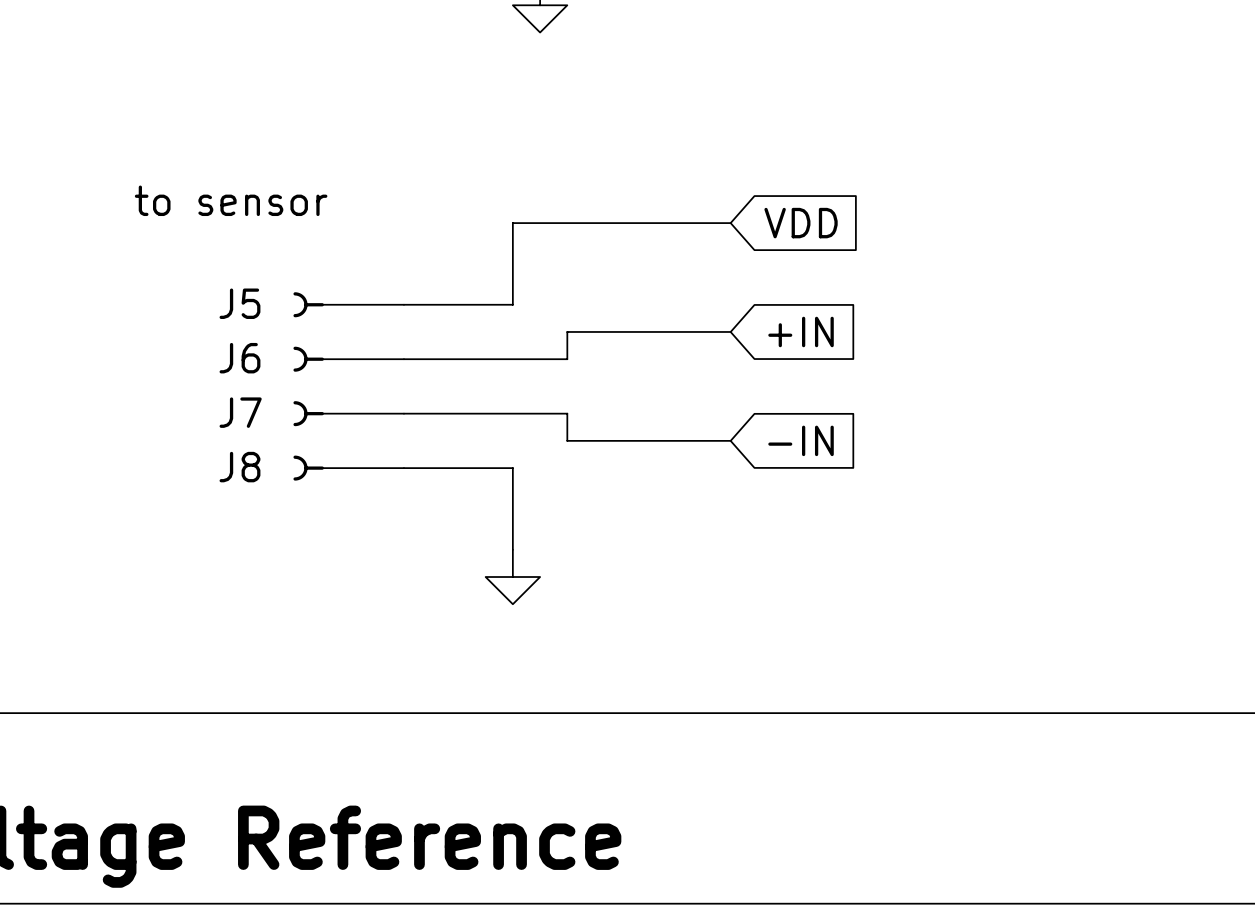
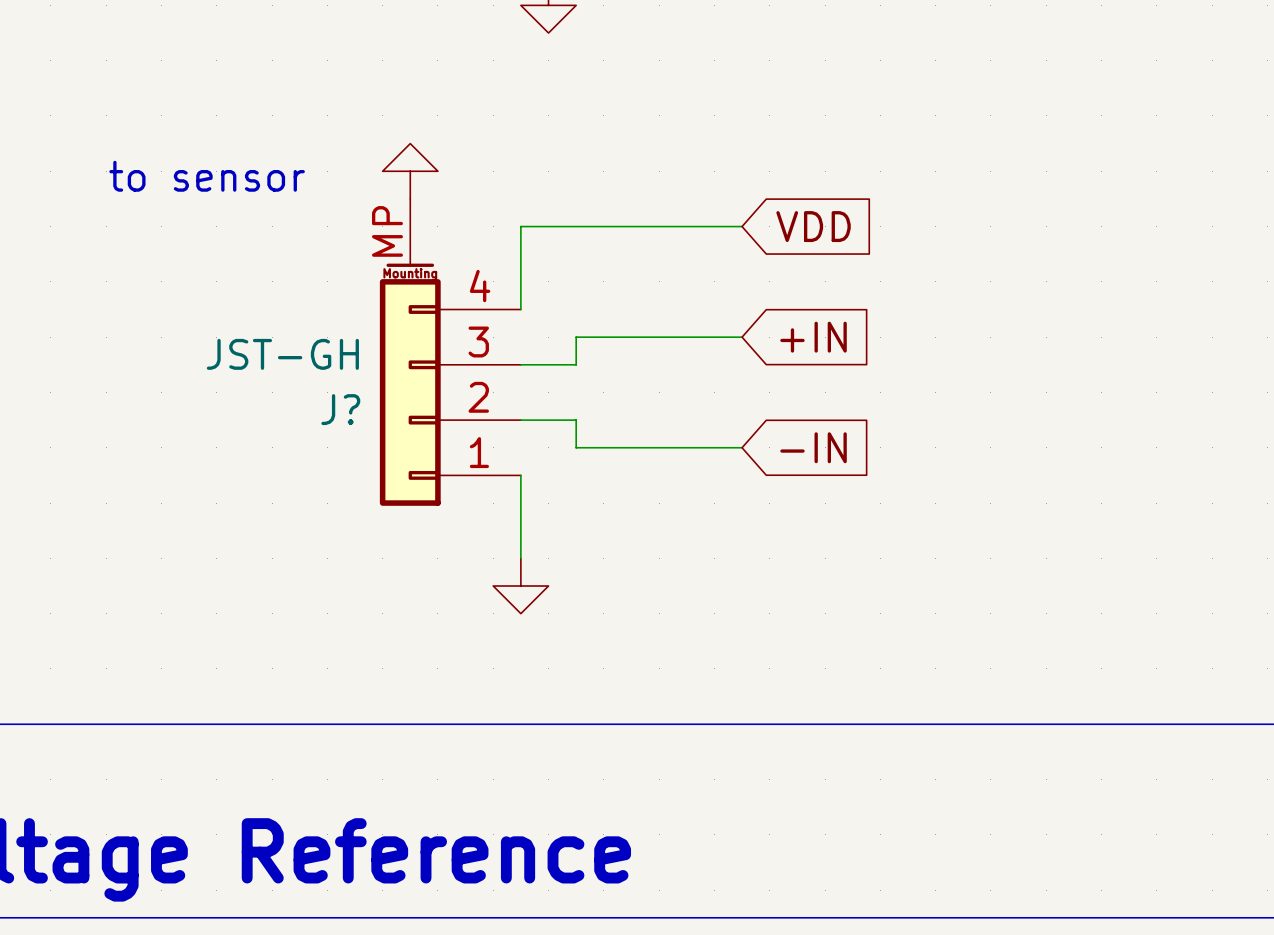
power symbol: none -> (410, 171)
text position: to sensor (231, 200) -> to sensor (207, 176)
J5: (348, 304) -> none
J?: none -> JST-GH (450, 352)
J6: (348, 359) -> none
J7: (348, 413) -> none
J8: (348, 468) -> none

